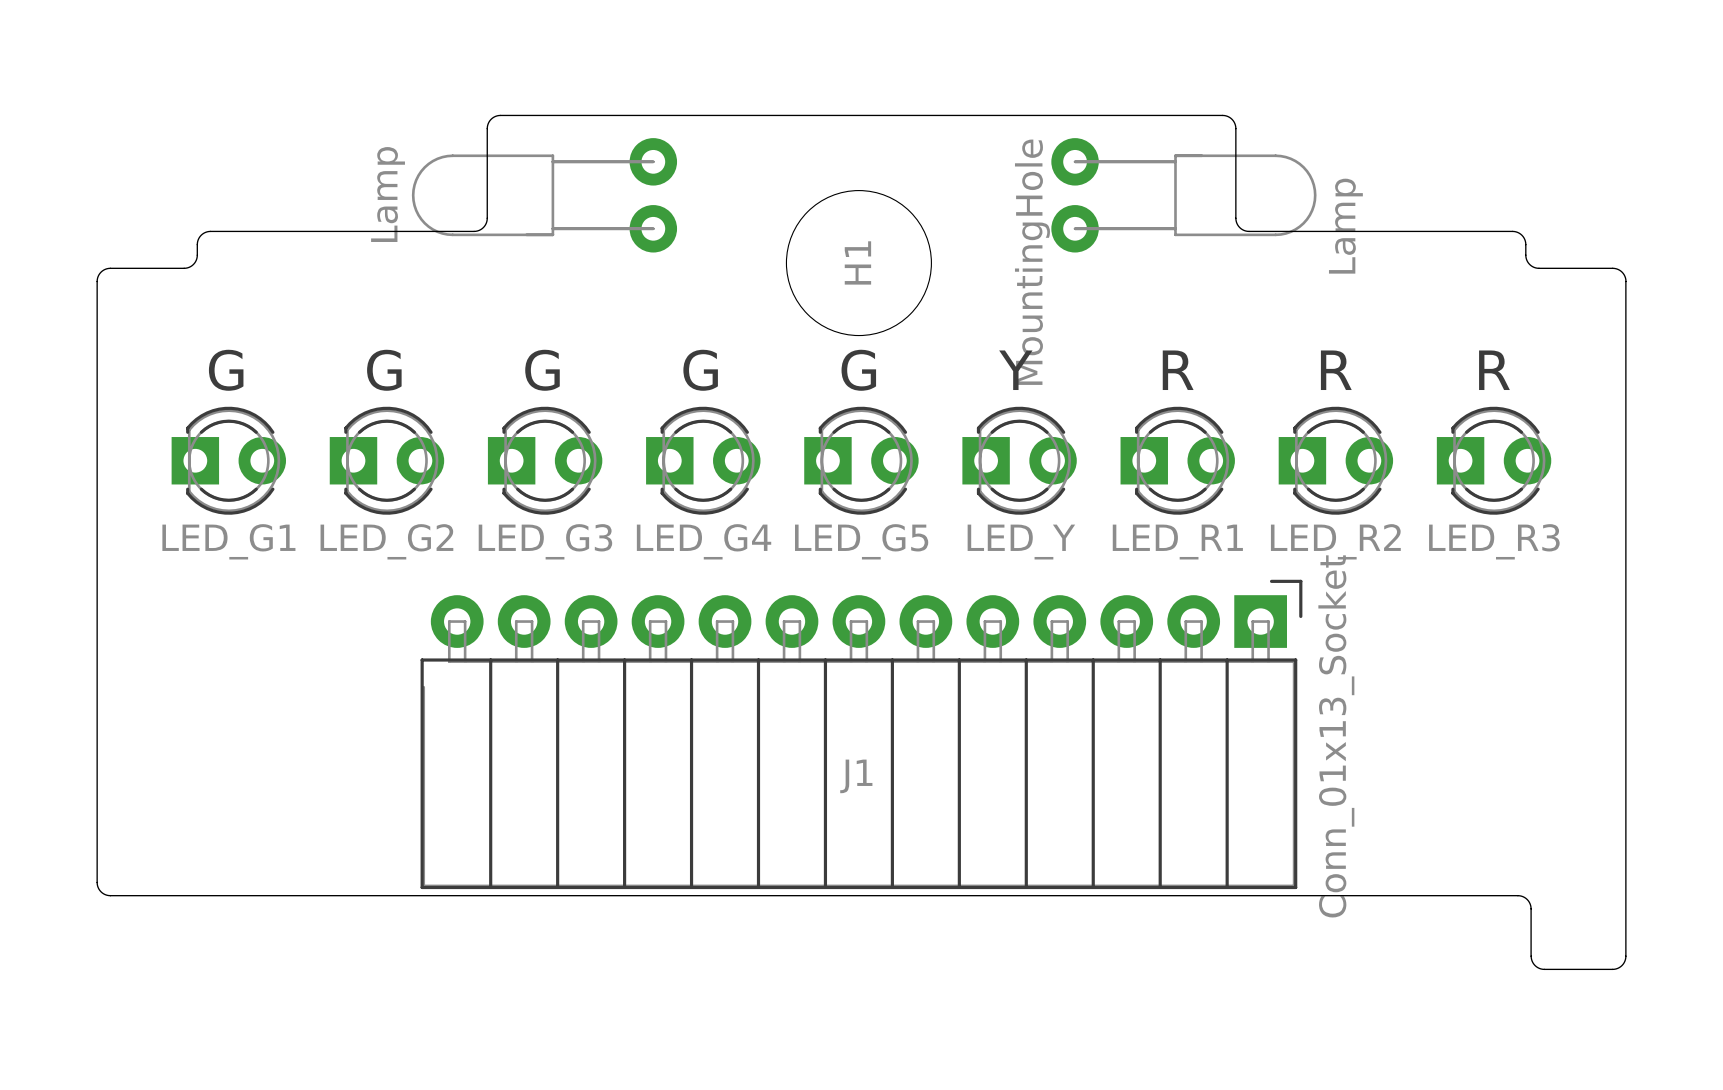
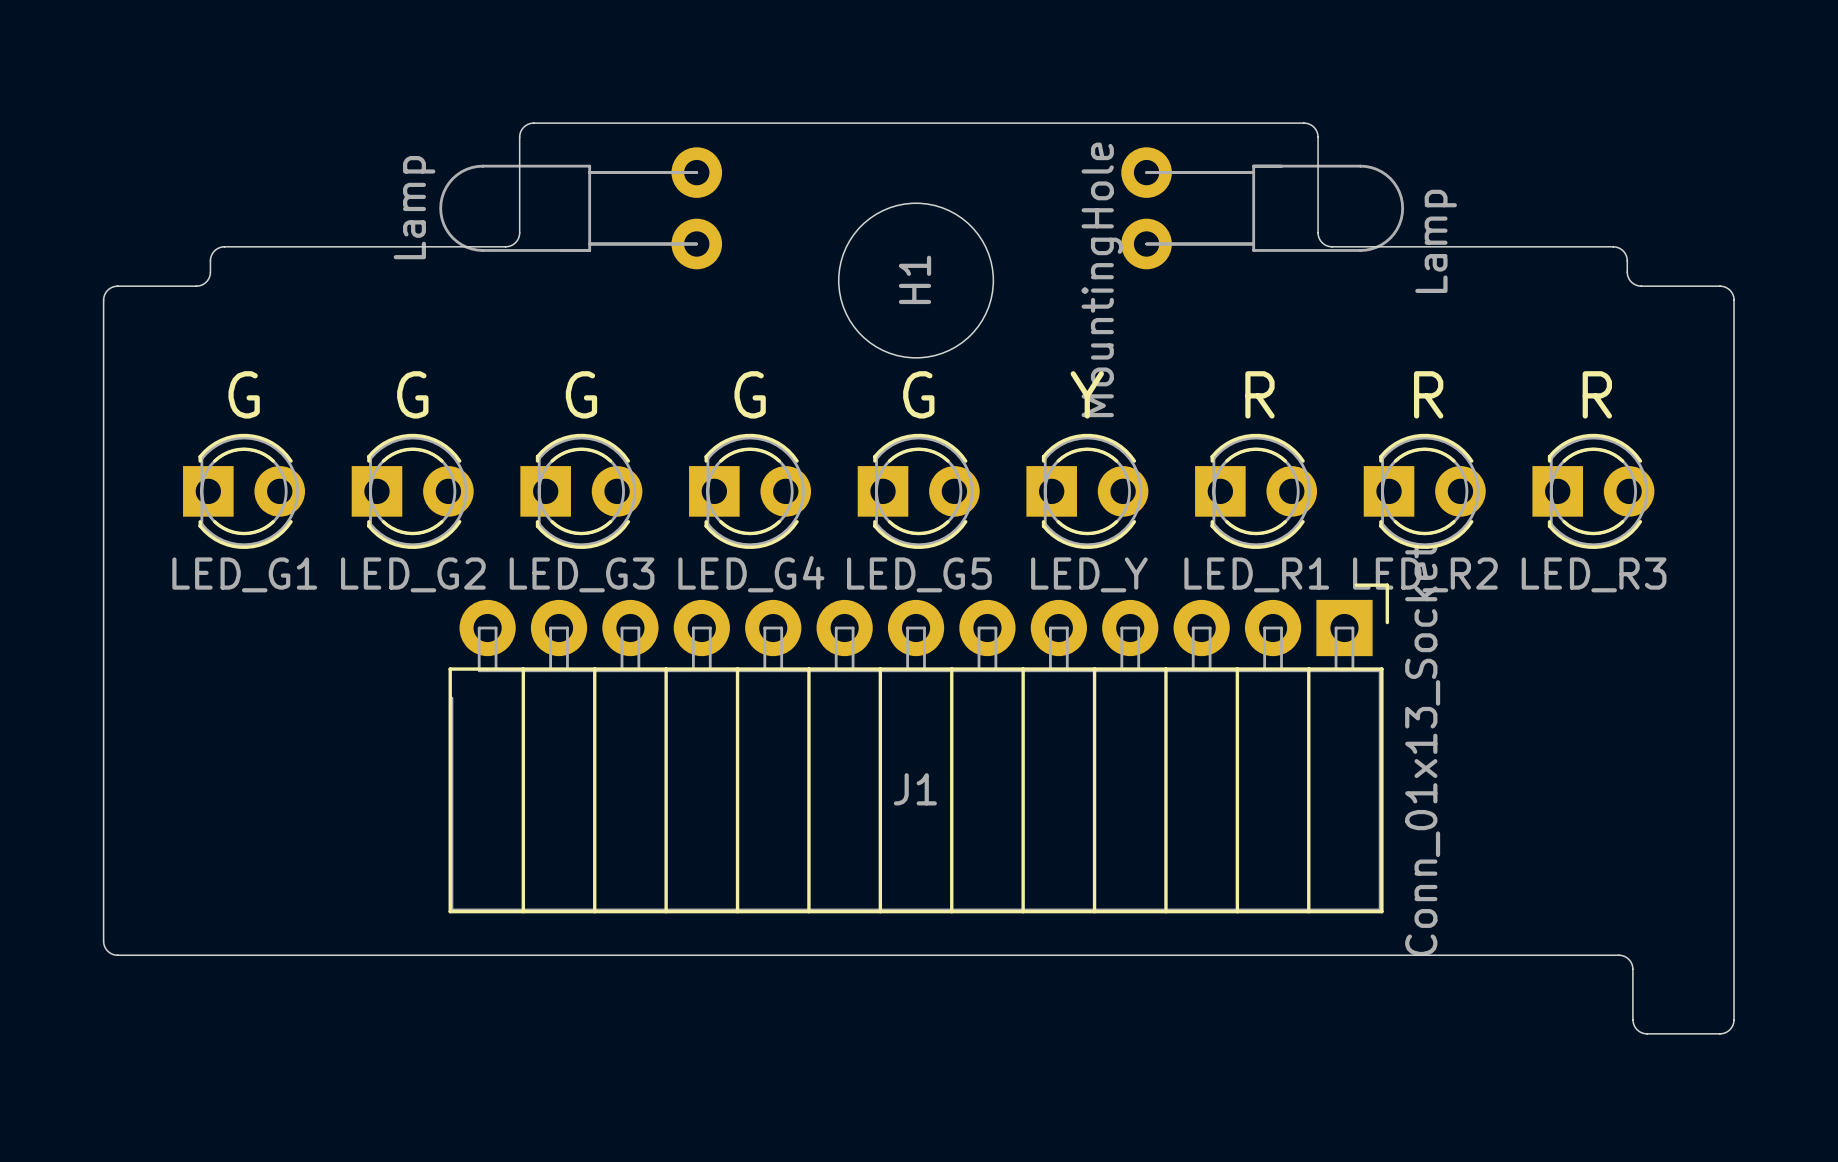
J1 position: (861, 734) -> (918, 748)

